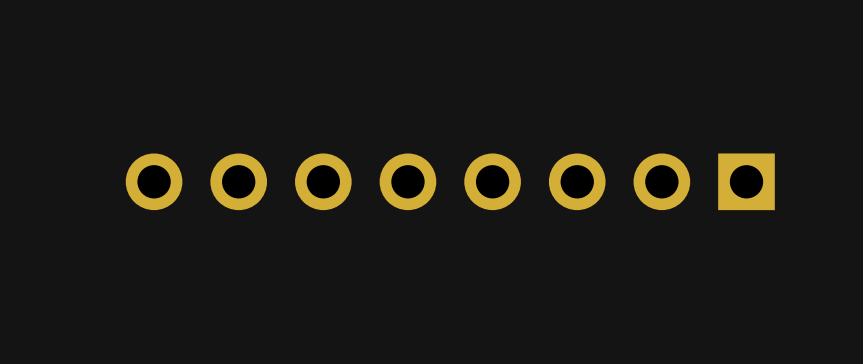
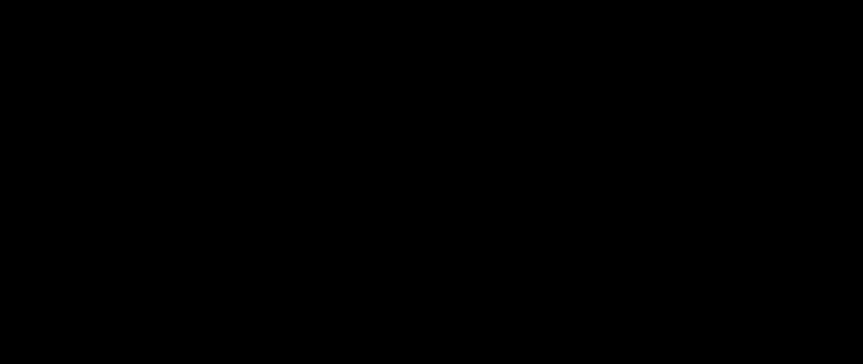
part: (450, 181) -> none

